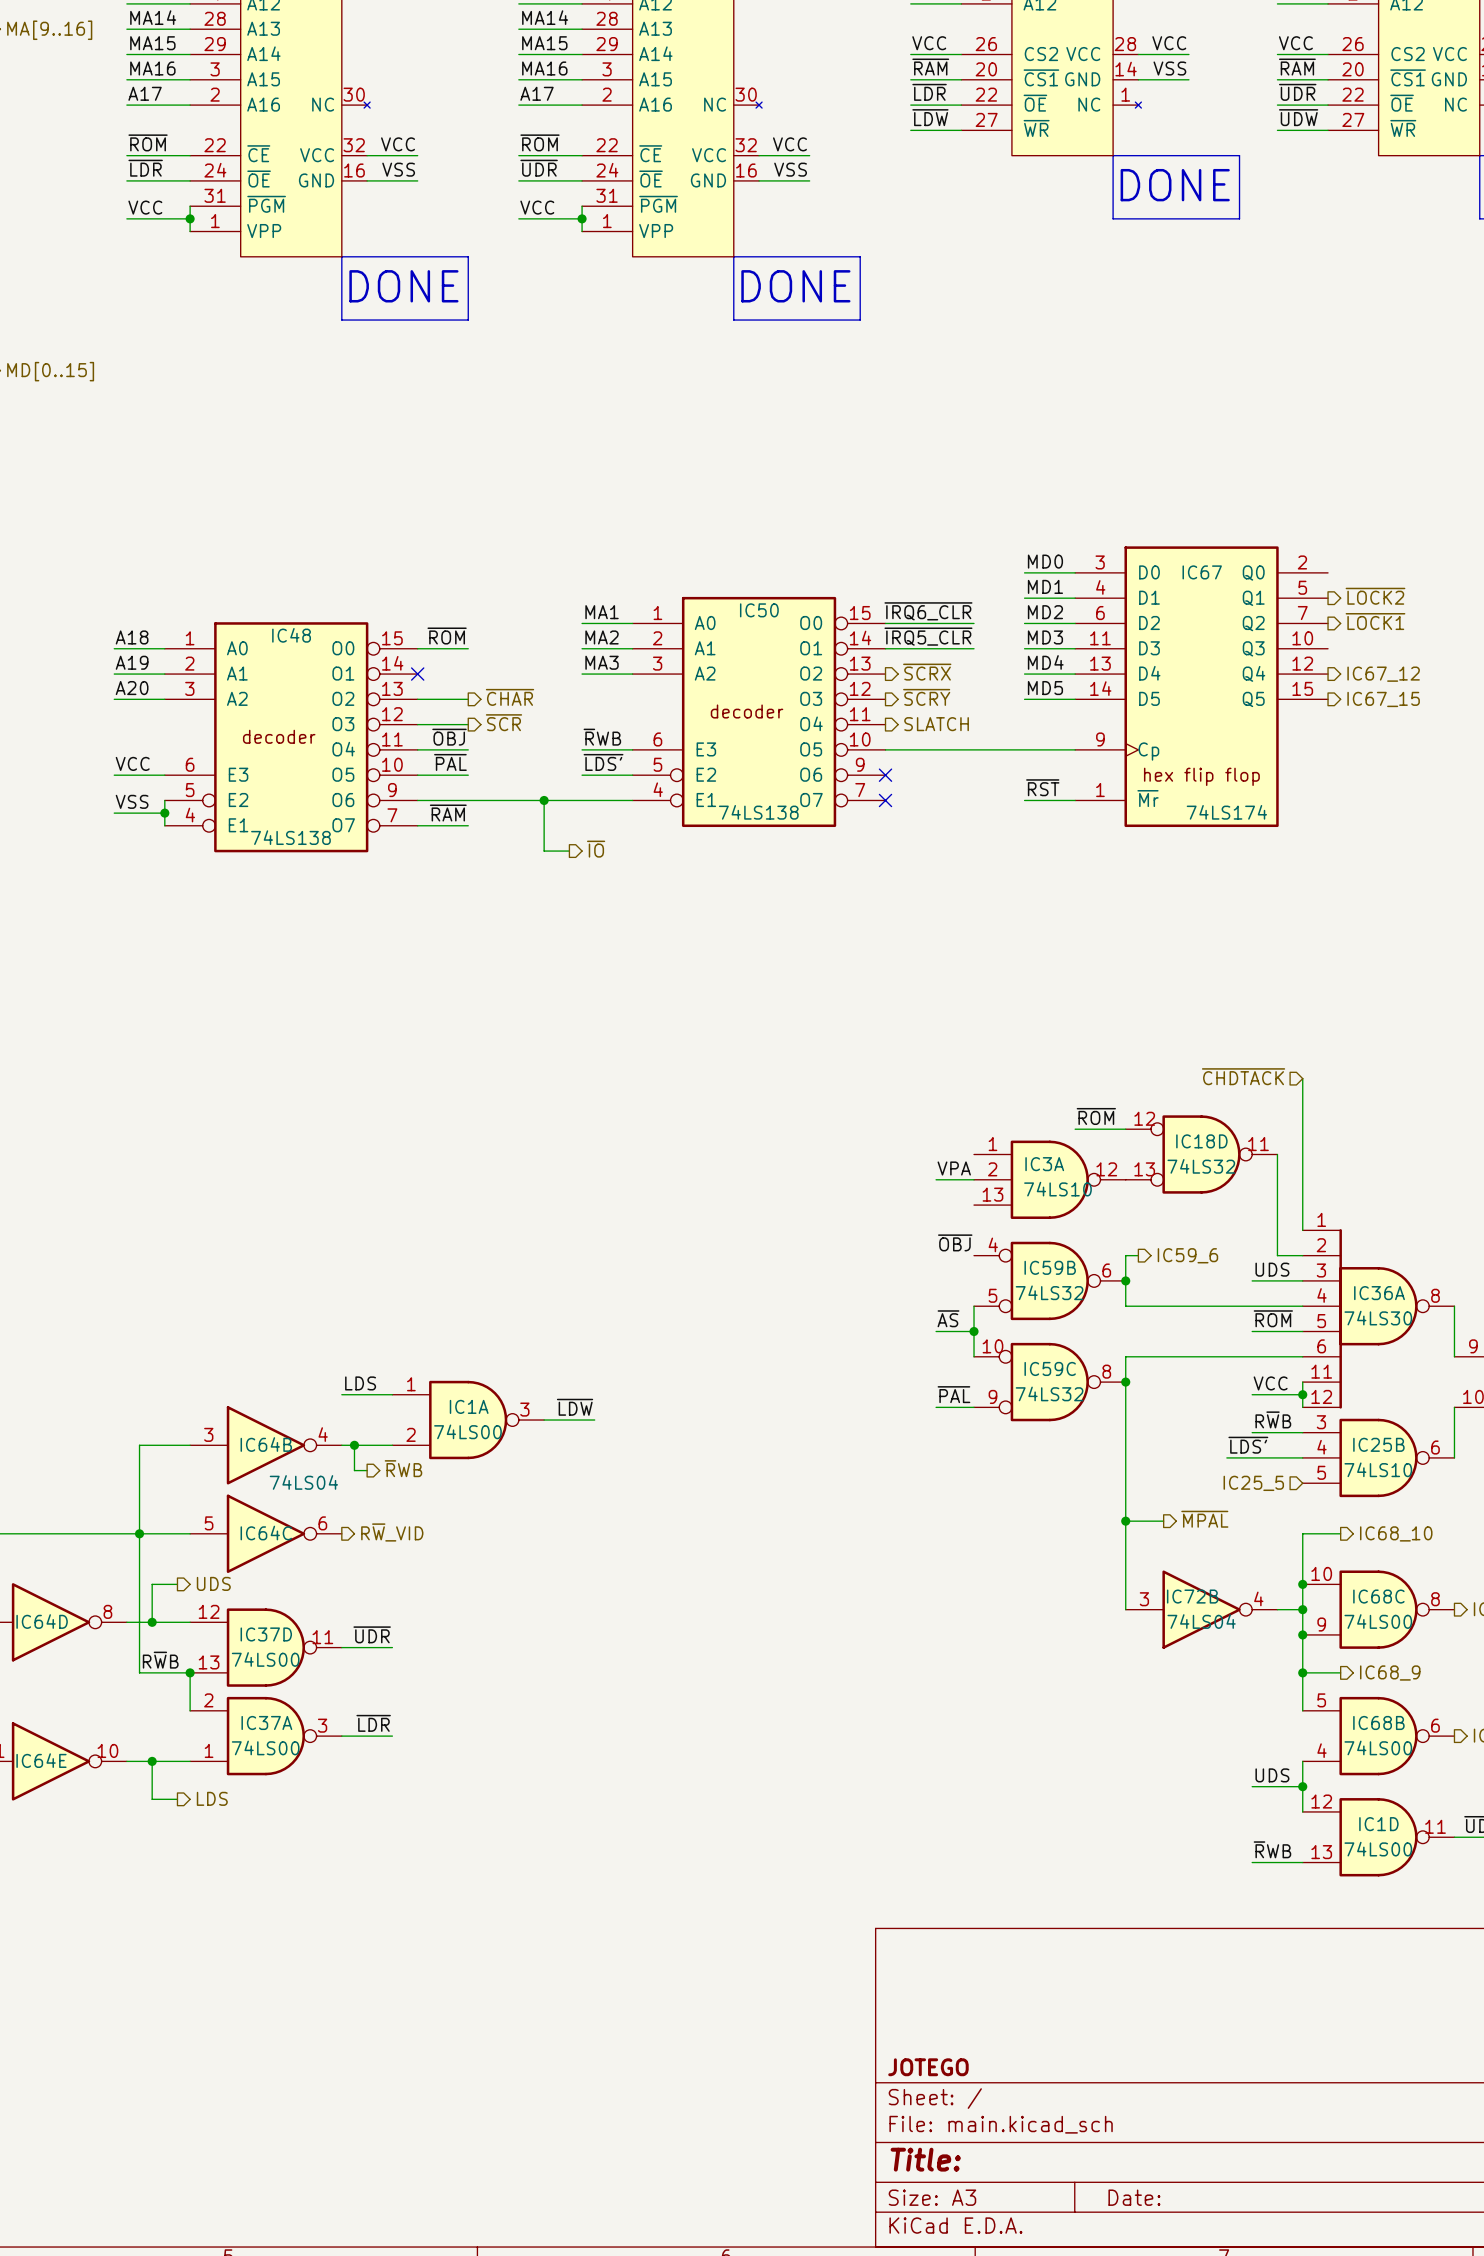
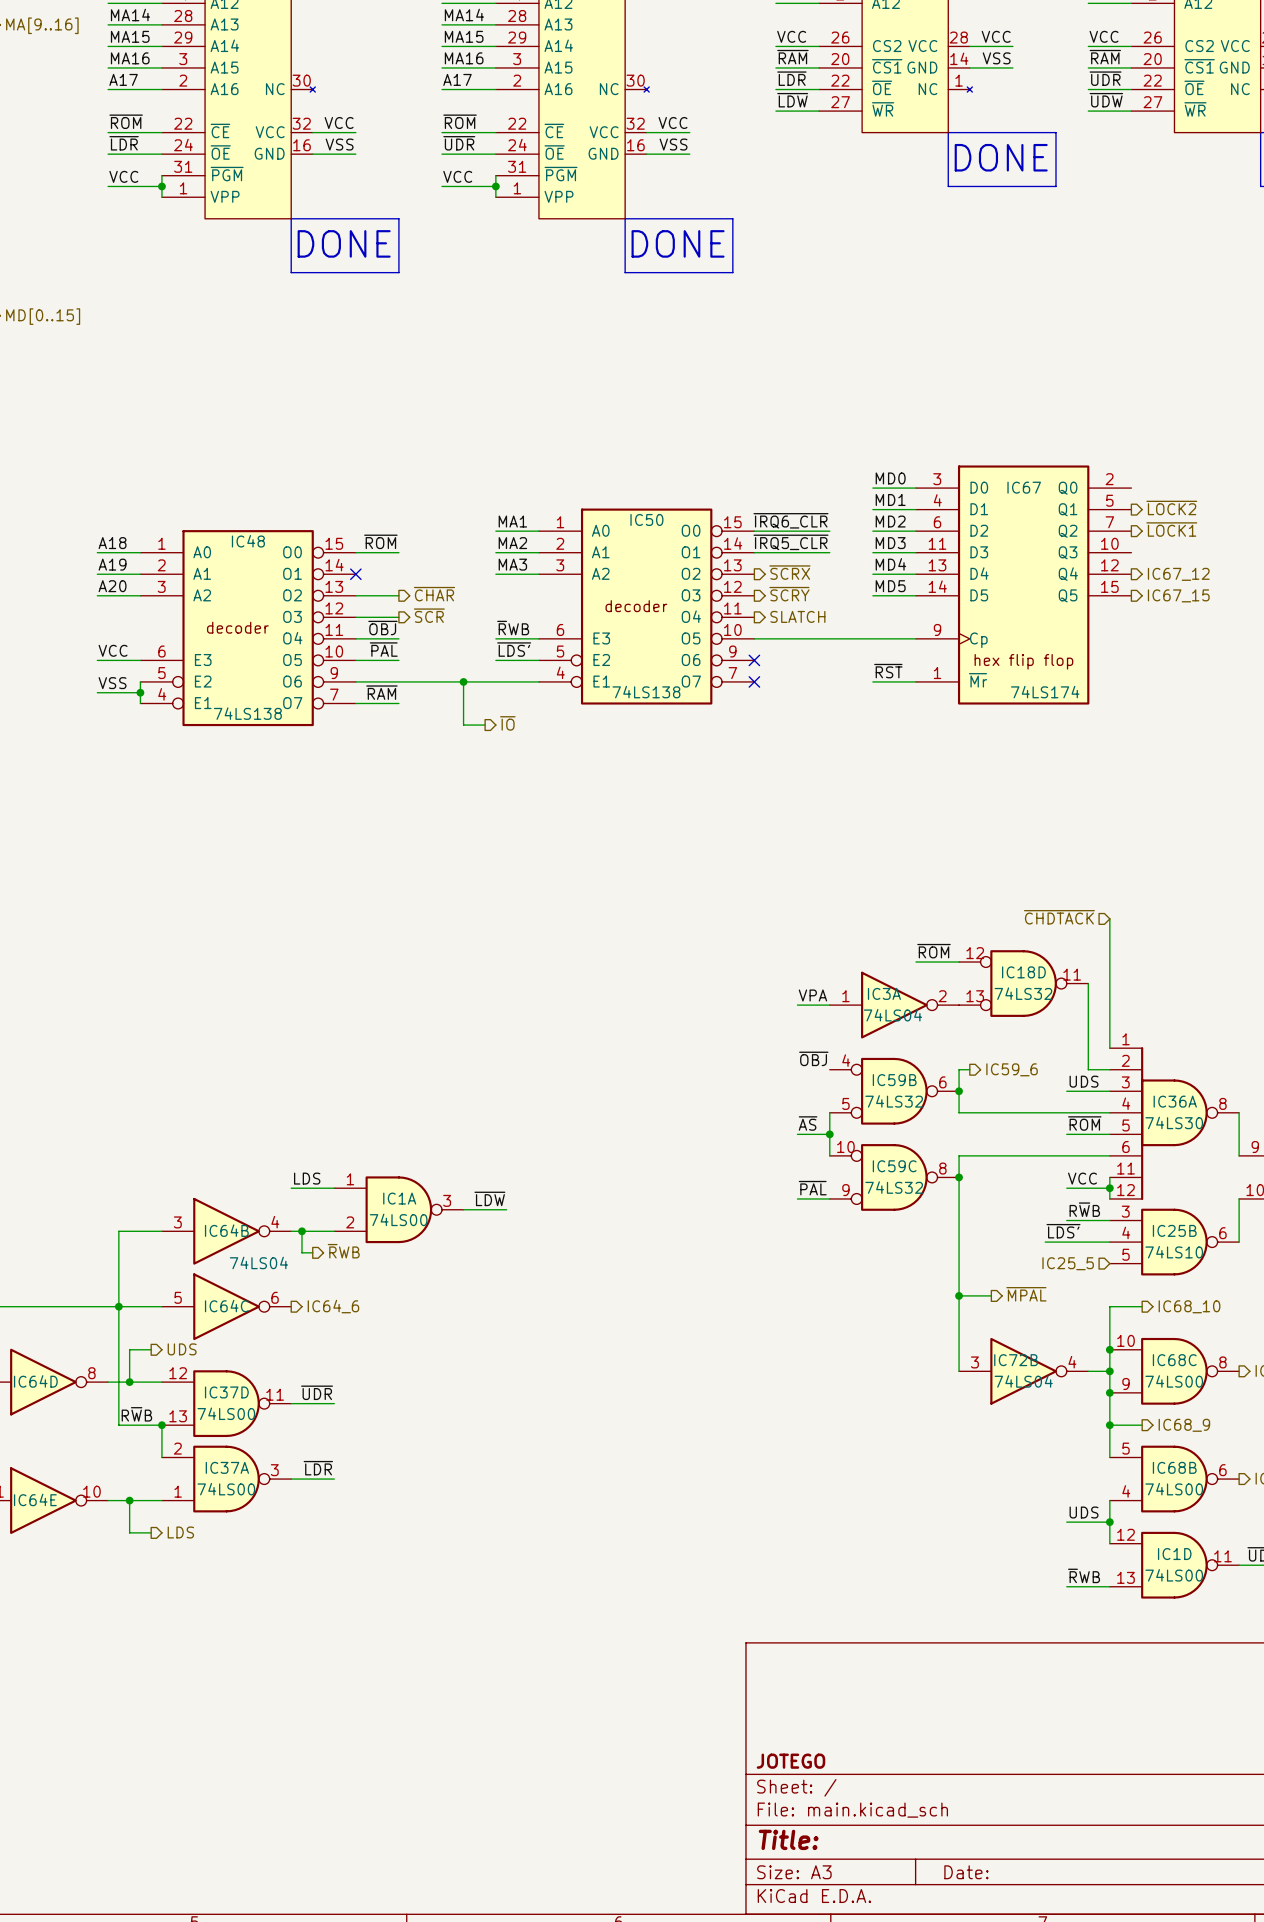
IC3A symbol: [974, 1140, 1126, 1219] -> [829, 971, 960, 1039]
IC3A value: 74LS10 (1057, 1189) -> 74LS04 (892, 1015)
hierarchical label: R~{W}_VID (392, 1532) -> IC64_6 (333, 1306)

